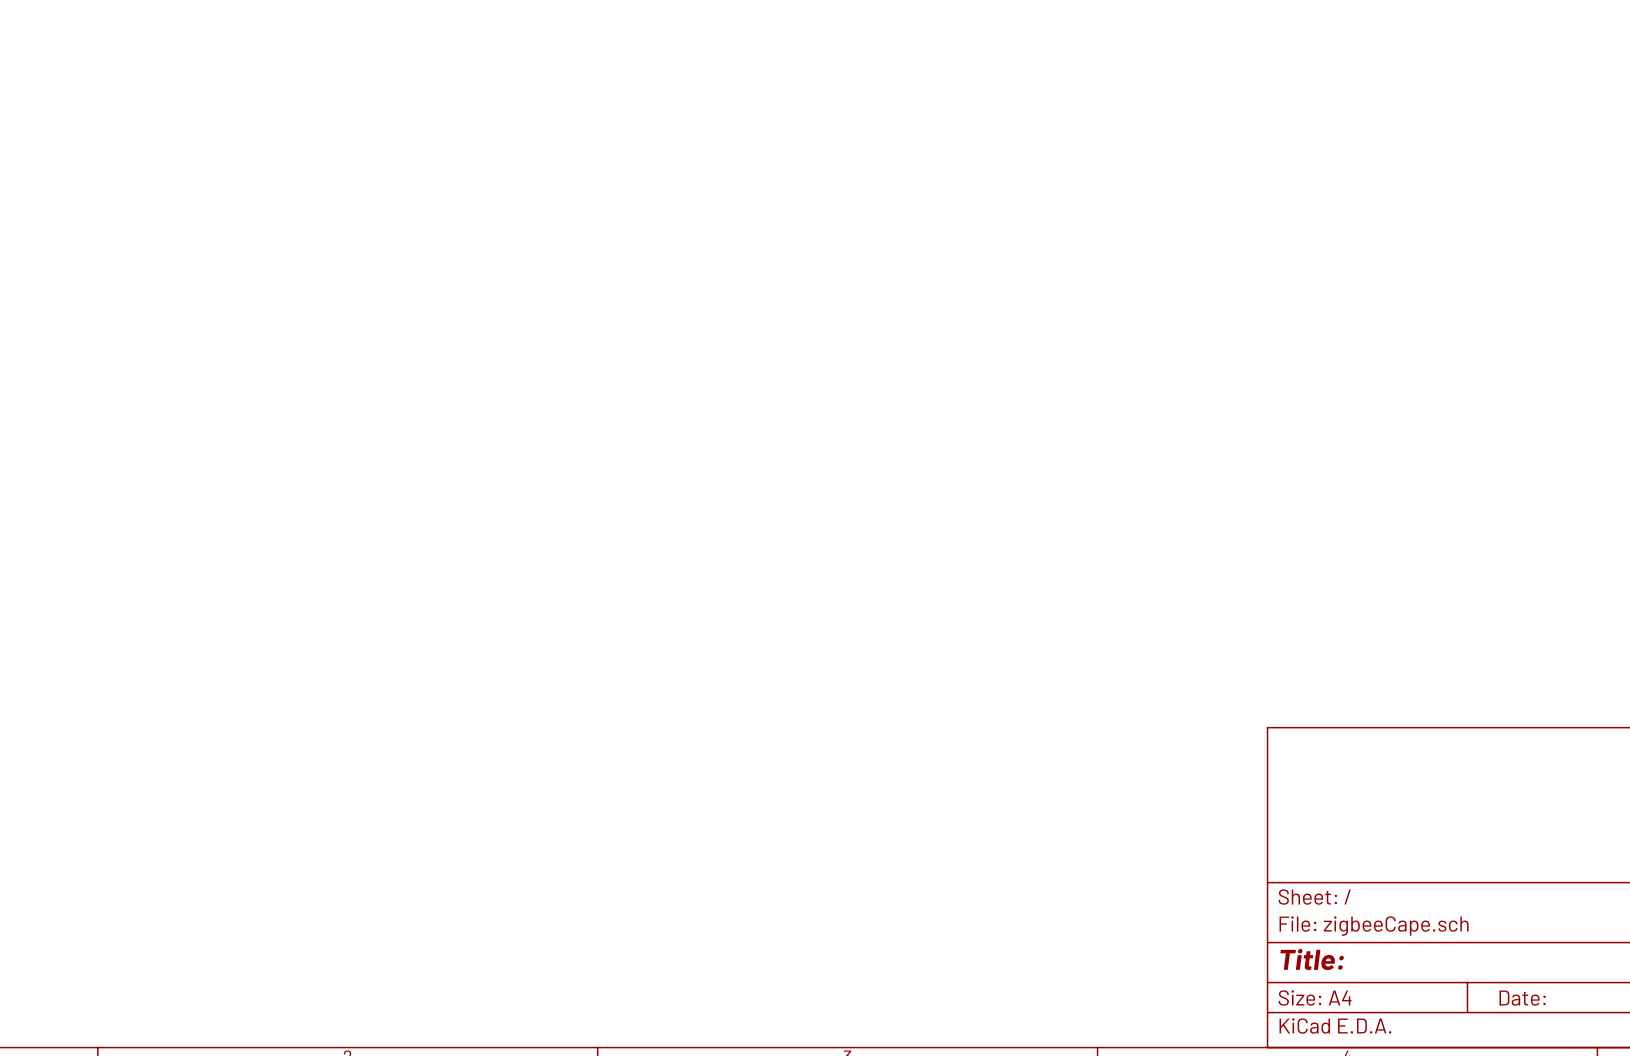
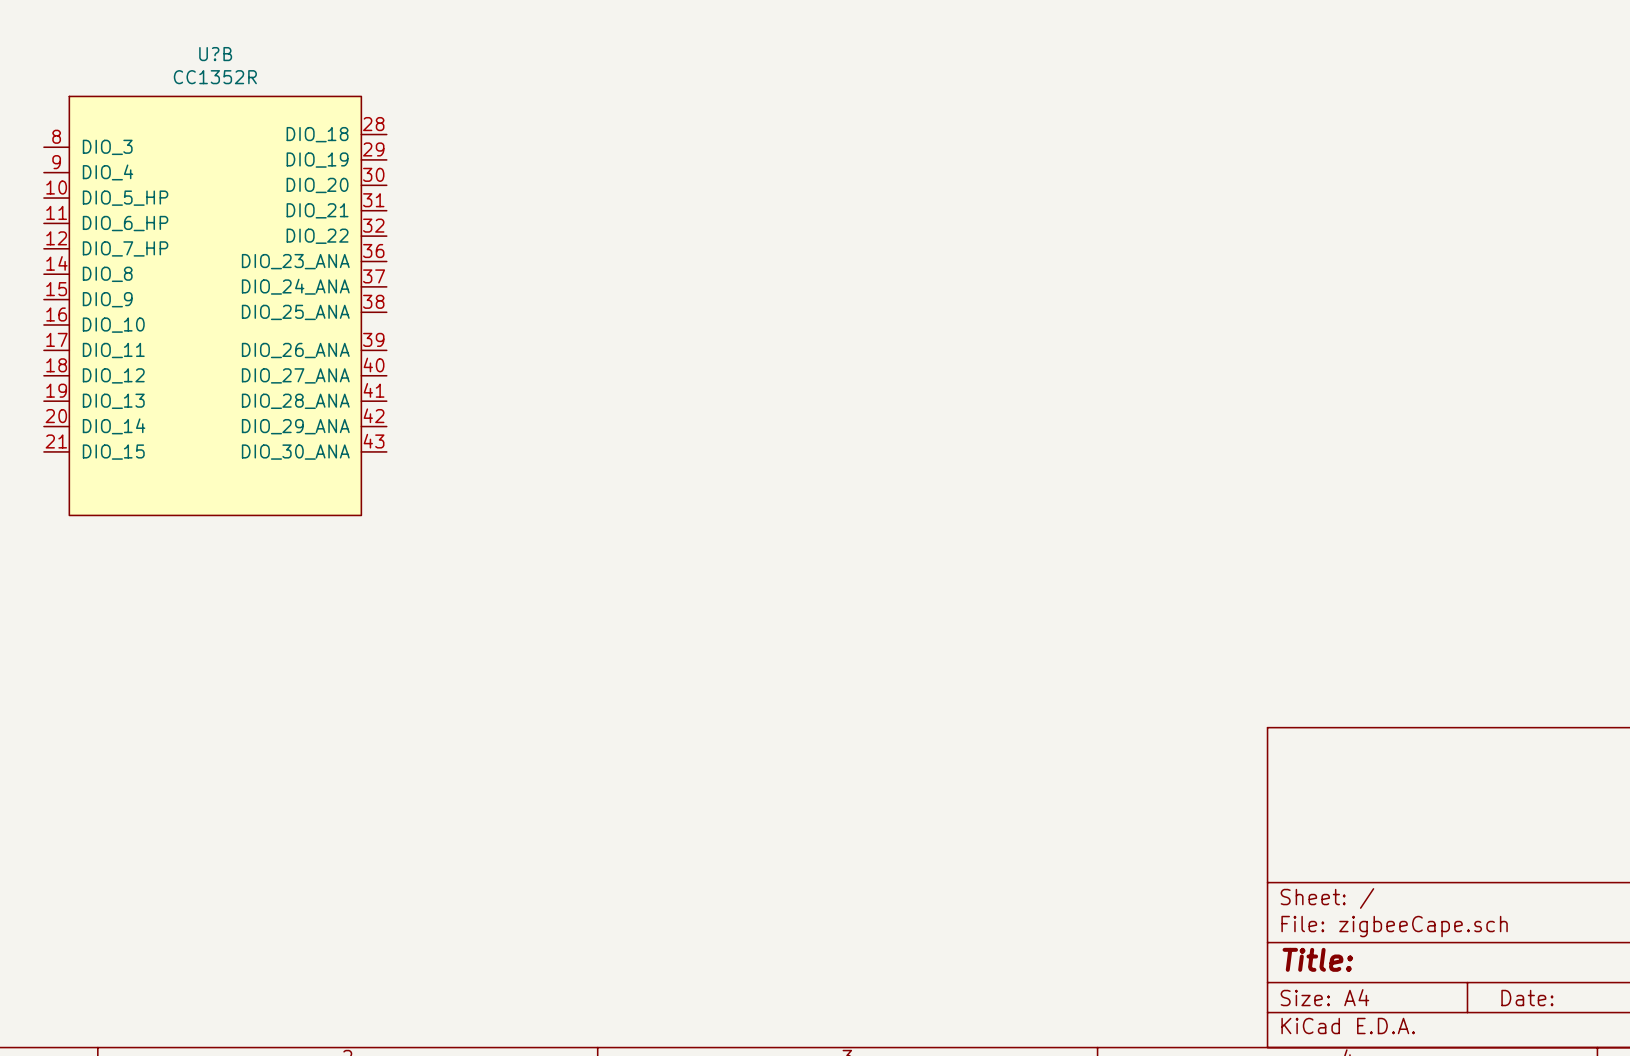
U?B: none -> CC1352R (215, 305)

